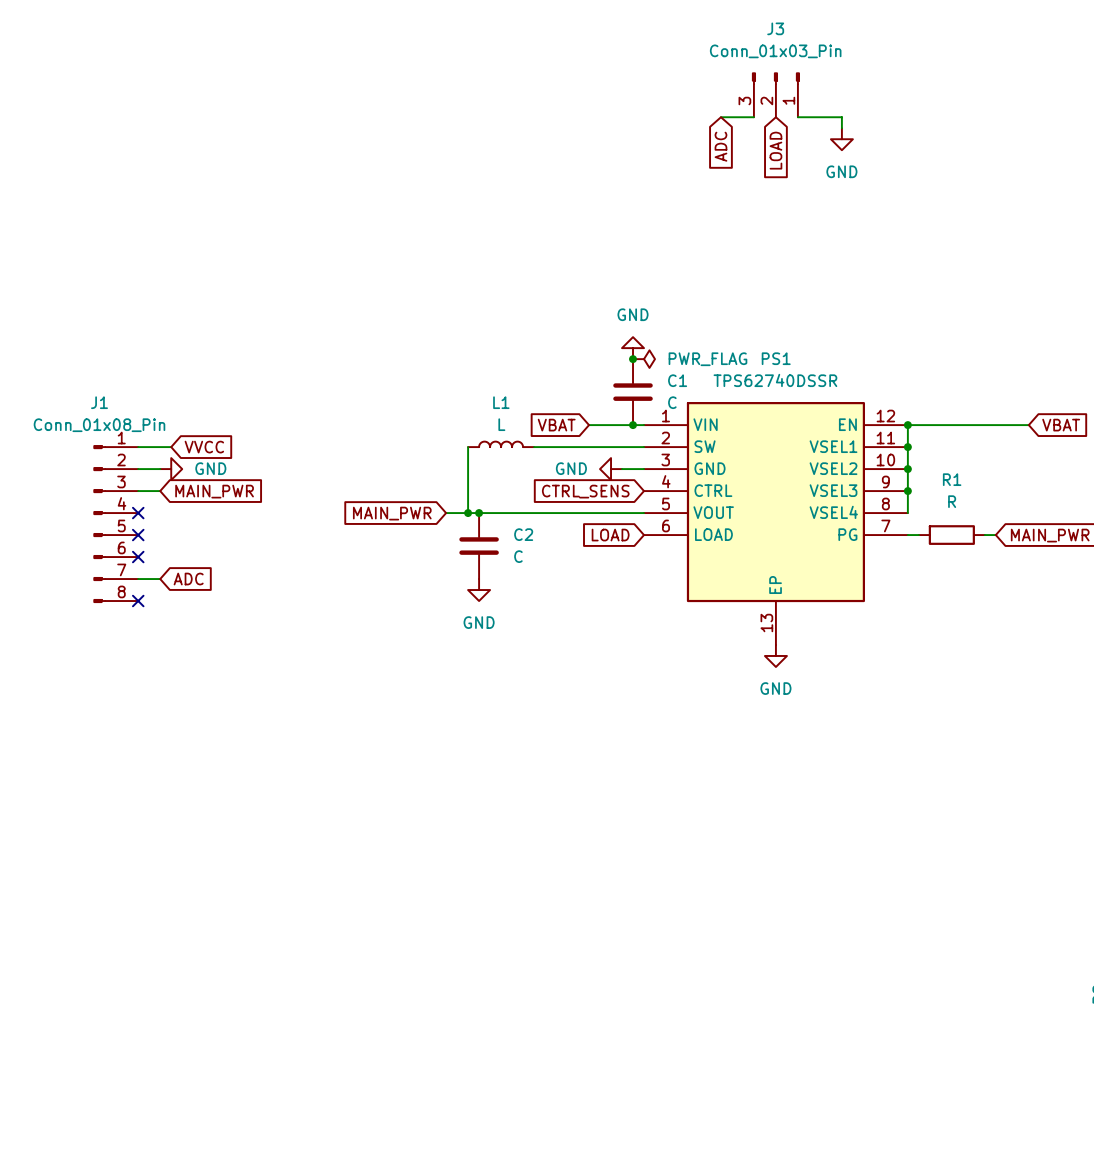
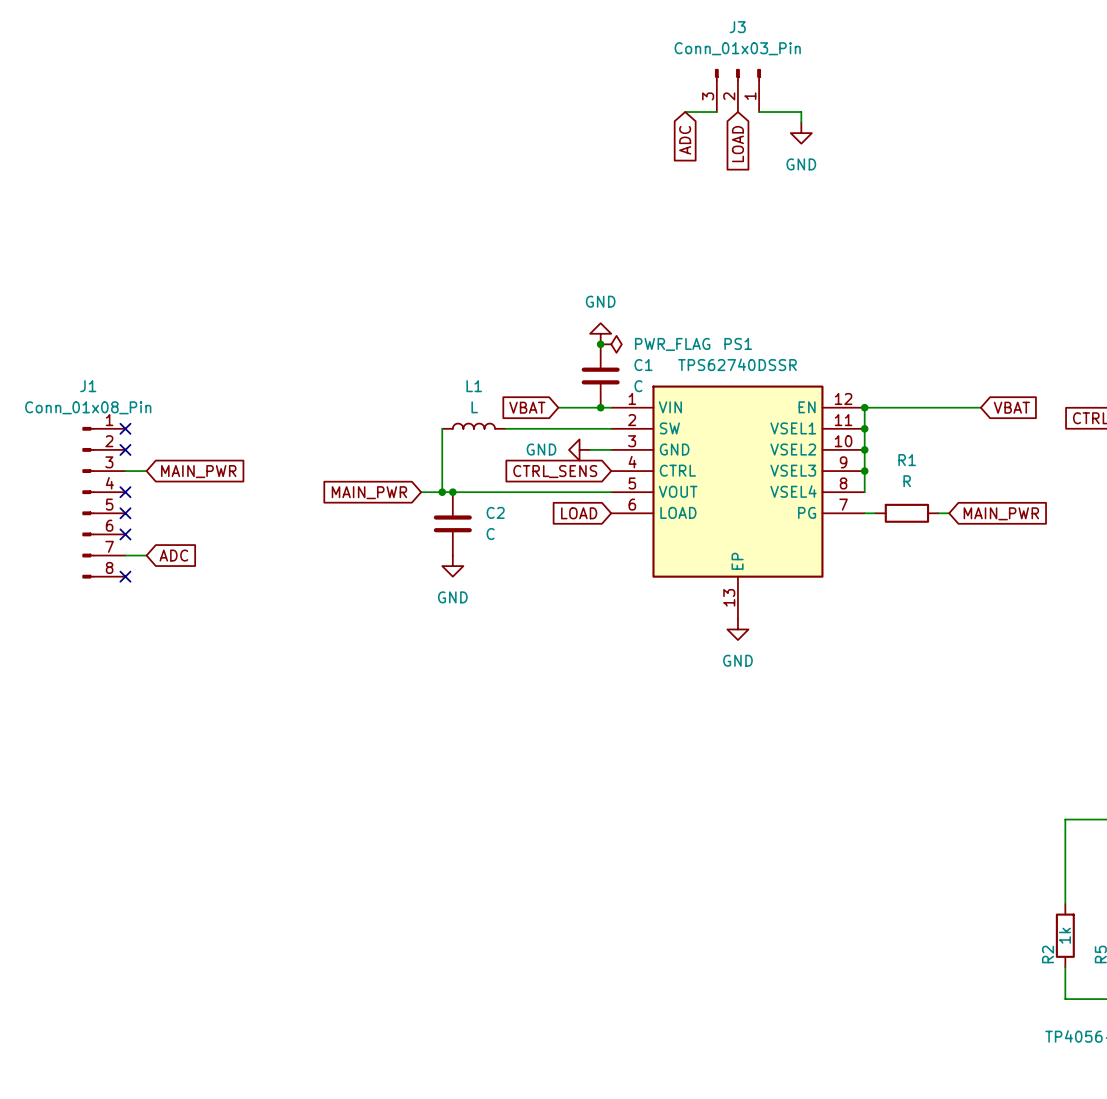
wire: (138, 447) (171, 447) -> none
no-connect mark: none -> (125, 428)
global label: VVCC (204, 447) -> none
wire: (138, 469) (160, 469) -> none
no-connect mark: none -> (125, 449)
power symbol: GND (171, 469) -> none

